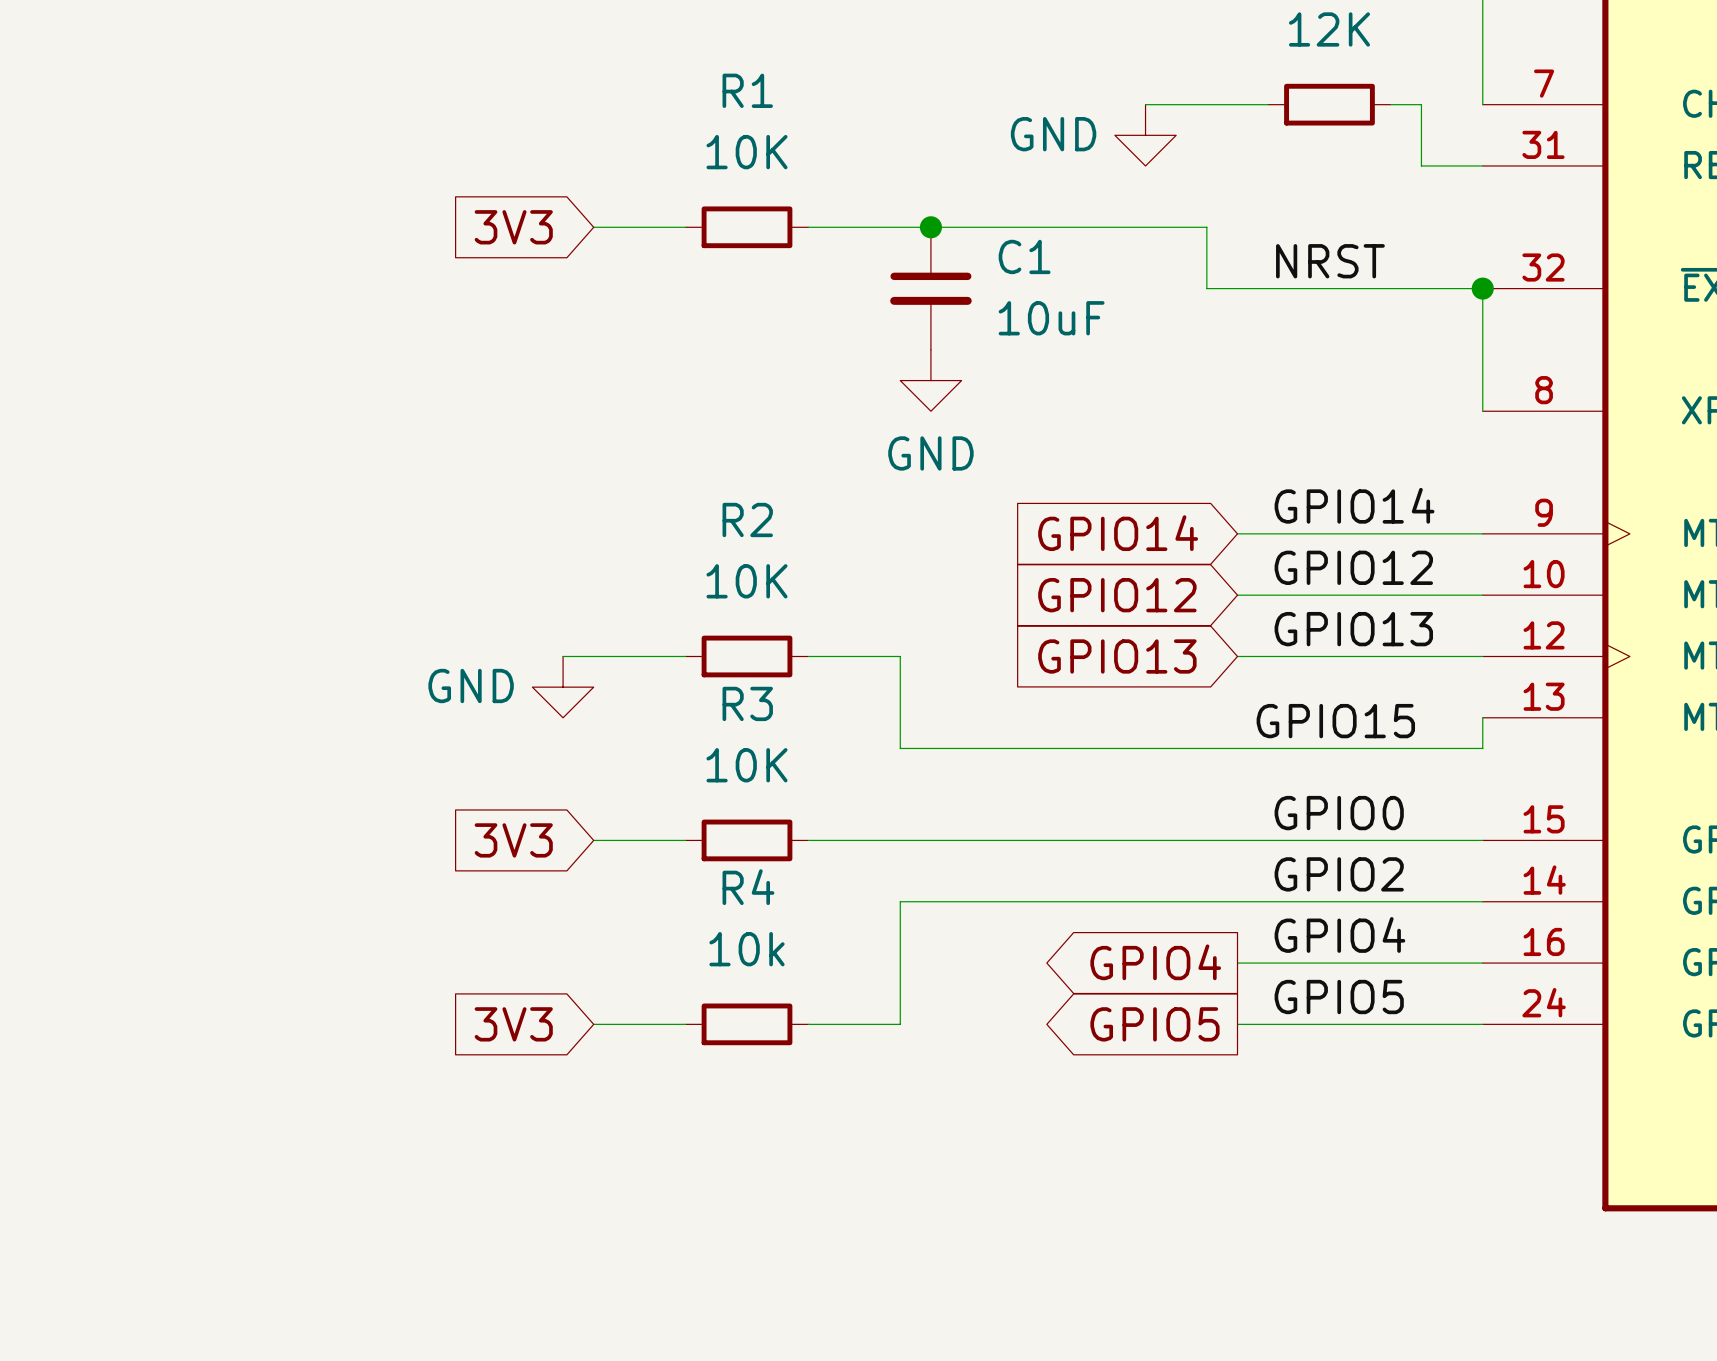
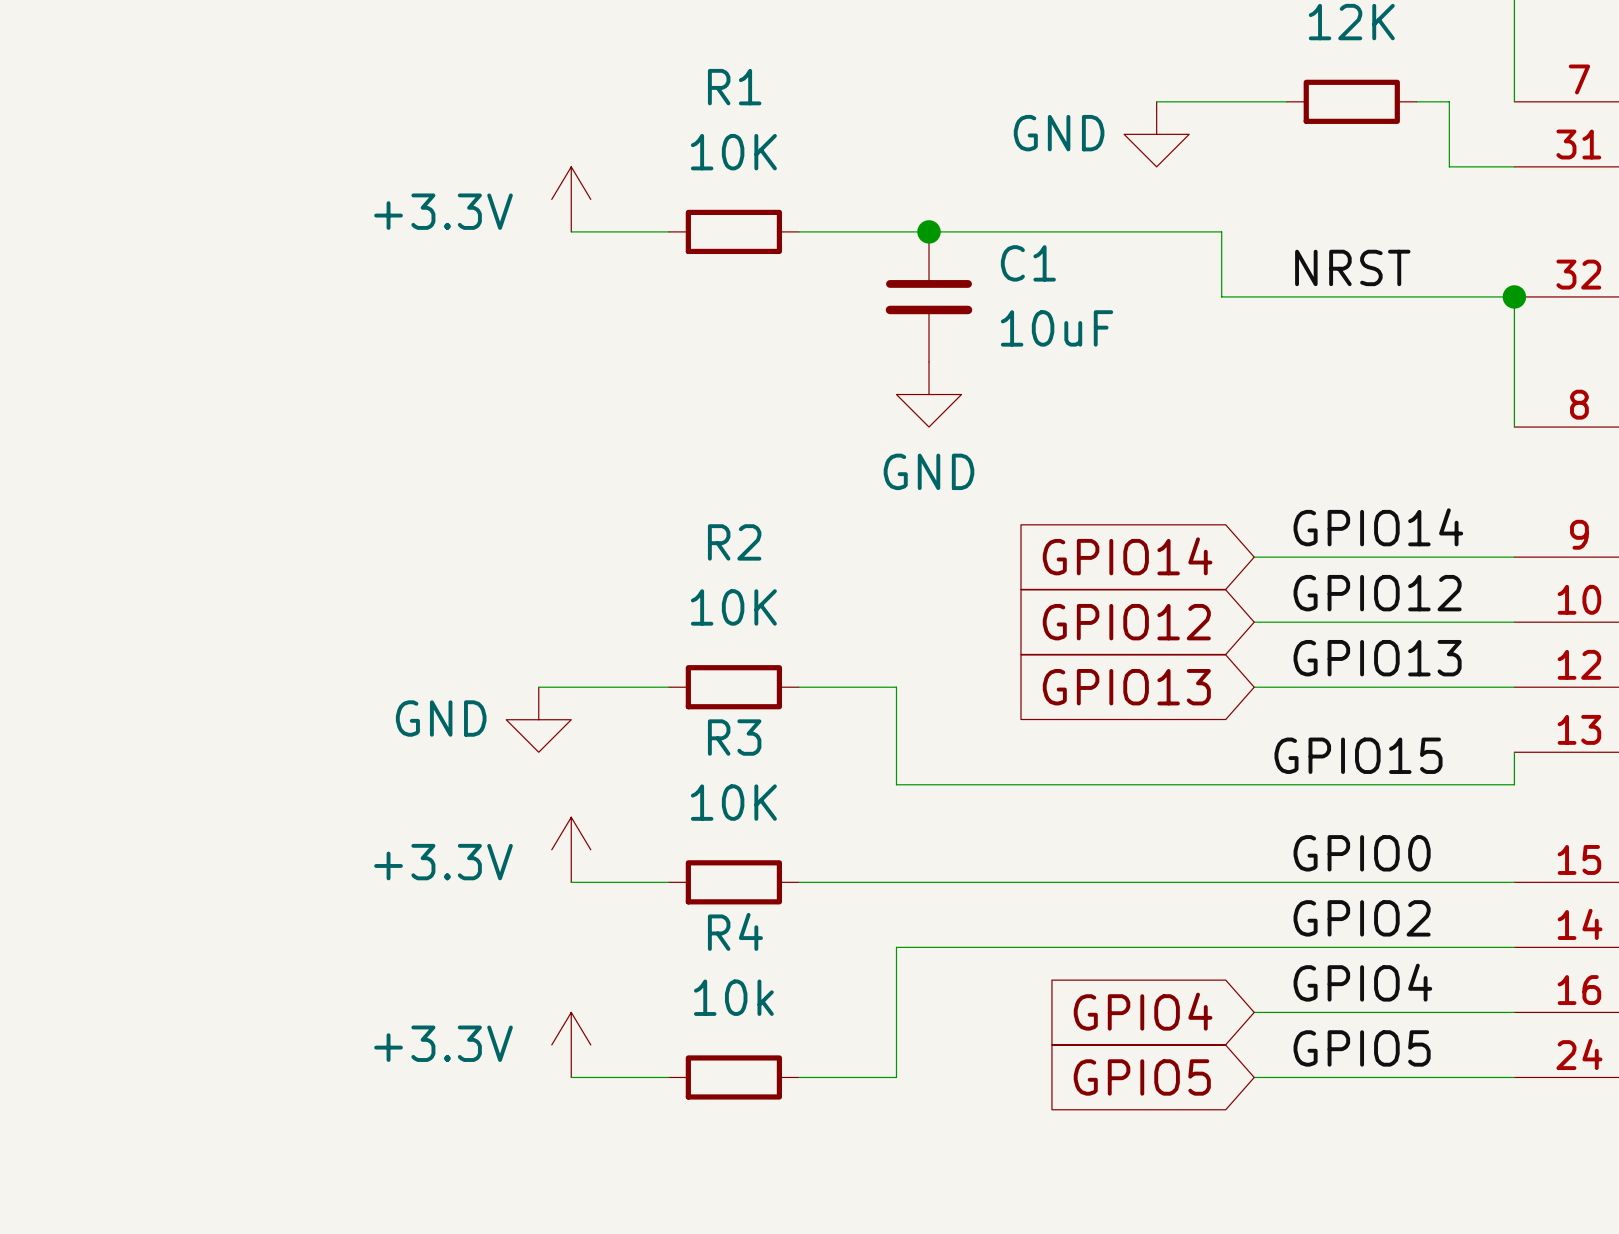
power symbol: none -> +3.3V (571, 199)
global label: 3V3 (513, 227) -> none
power symbol: none -> +3.3V (571, 849)
global label: 3V3 (513, 840) -> none
global label shape: output (1155, 962) -> input (1143, 1011)
power symbol: none -> +3.3V (571, 1044)
global label: 3V3 (513, 1024) -> none
global label shape: output (1154, 1024) -> input (1142, 1077)

